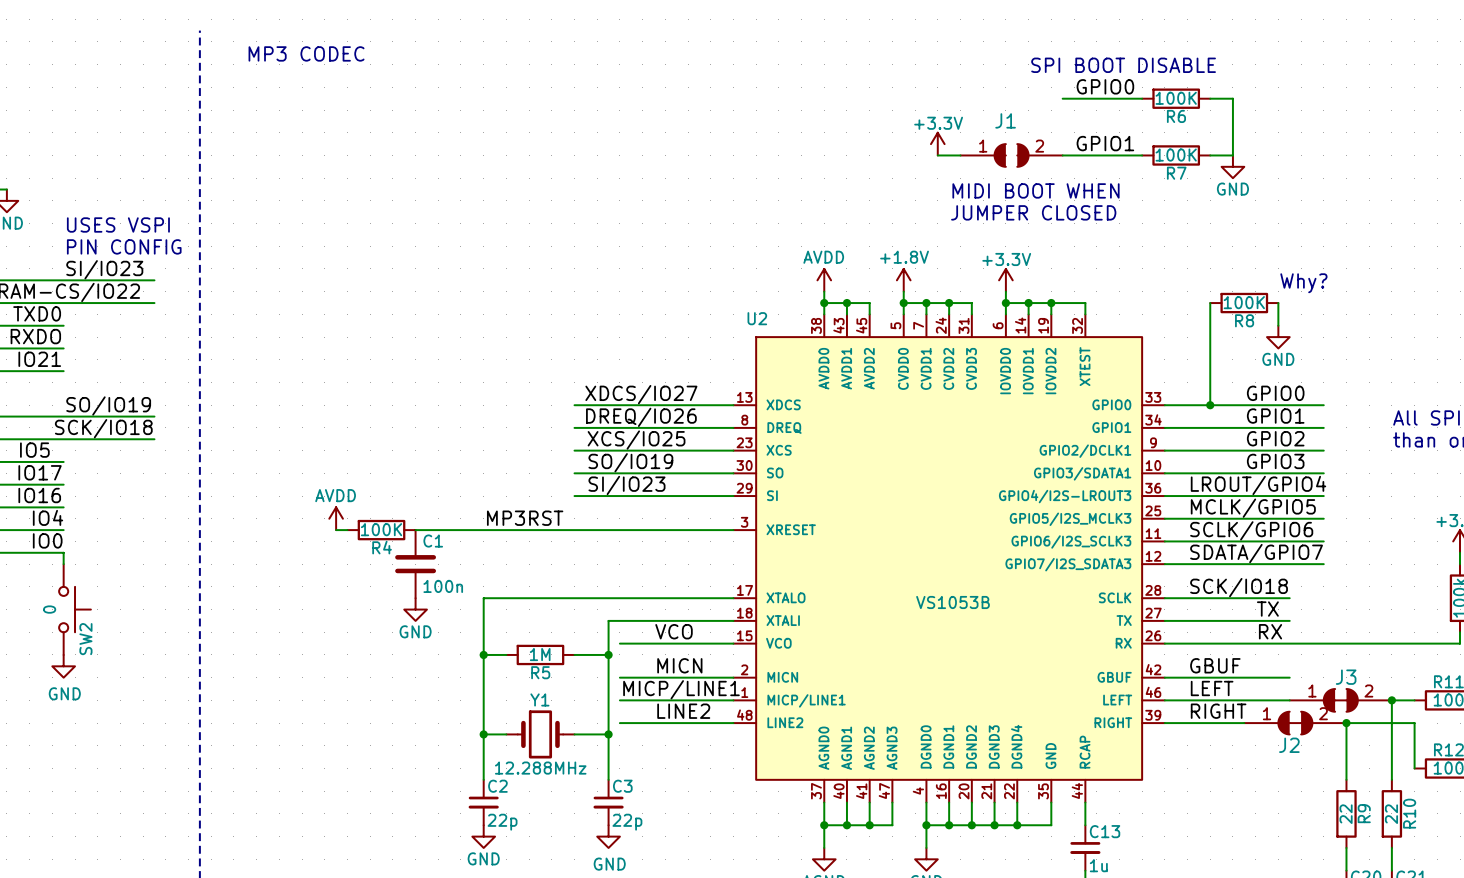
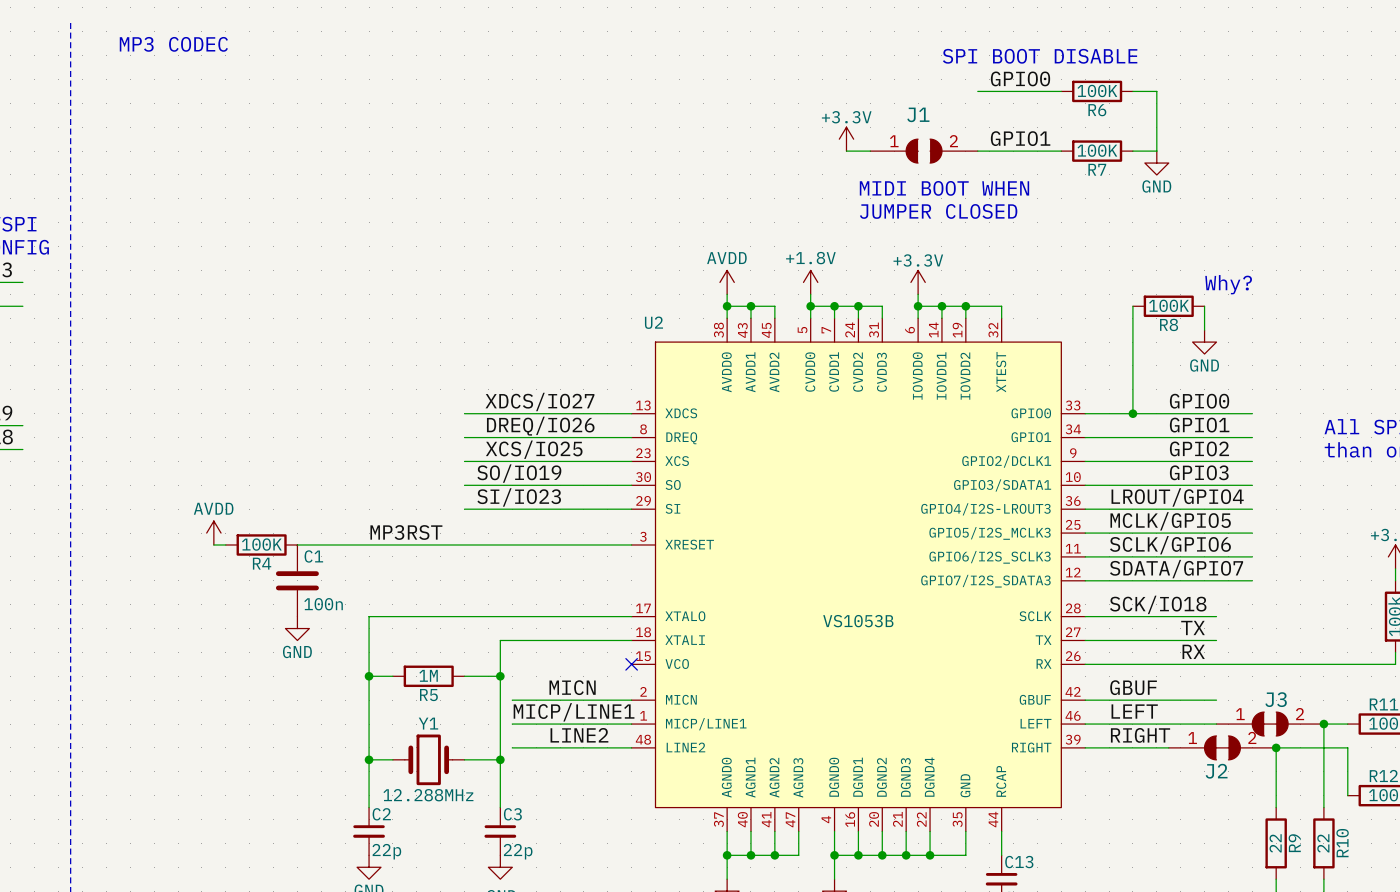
label: VCO (674, 631) -> none
wire: (619, 643) (733, 643) -> none
no-connect mark: none -> (631, 664)

